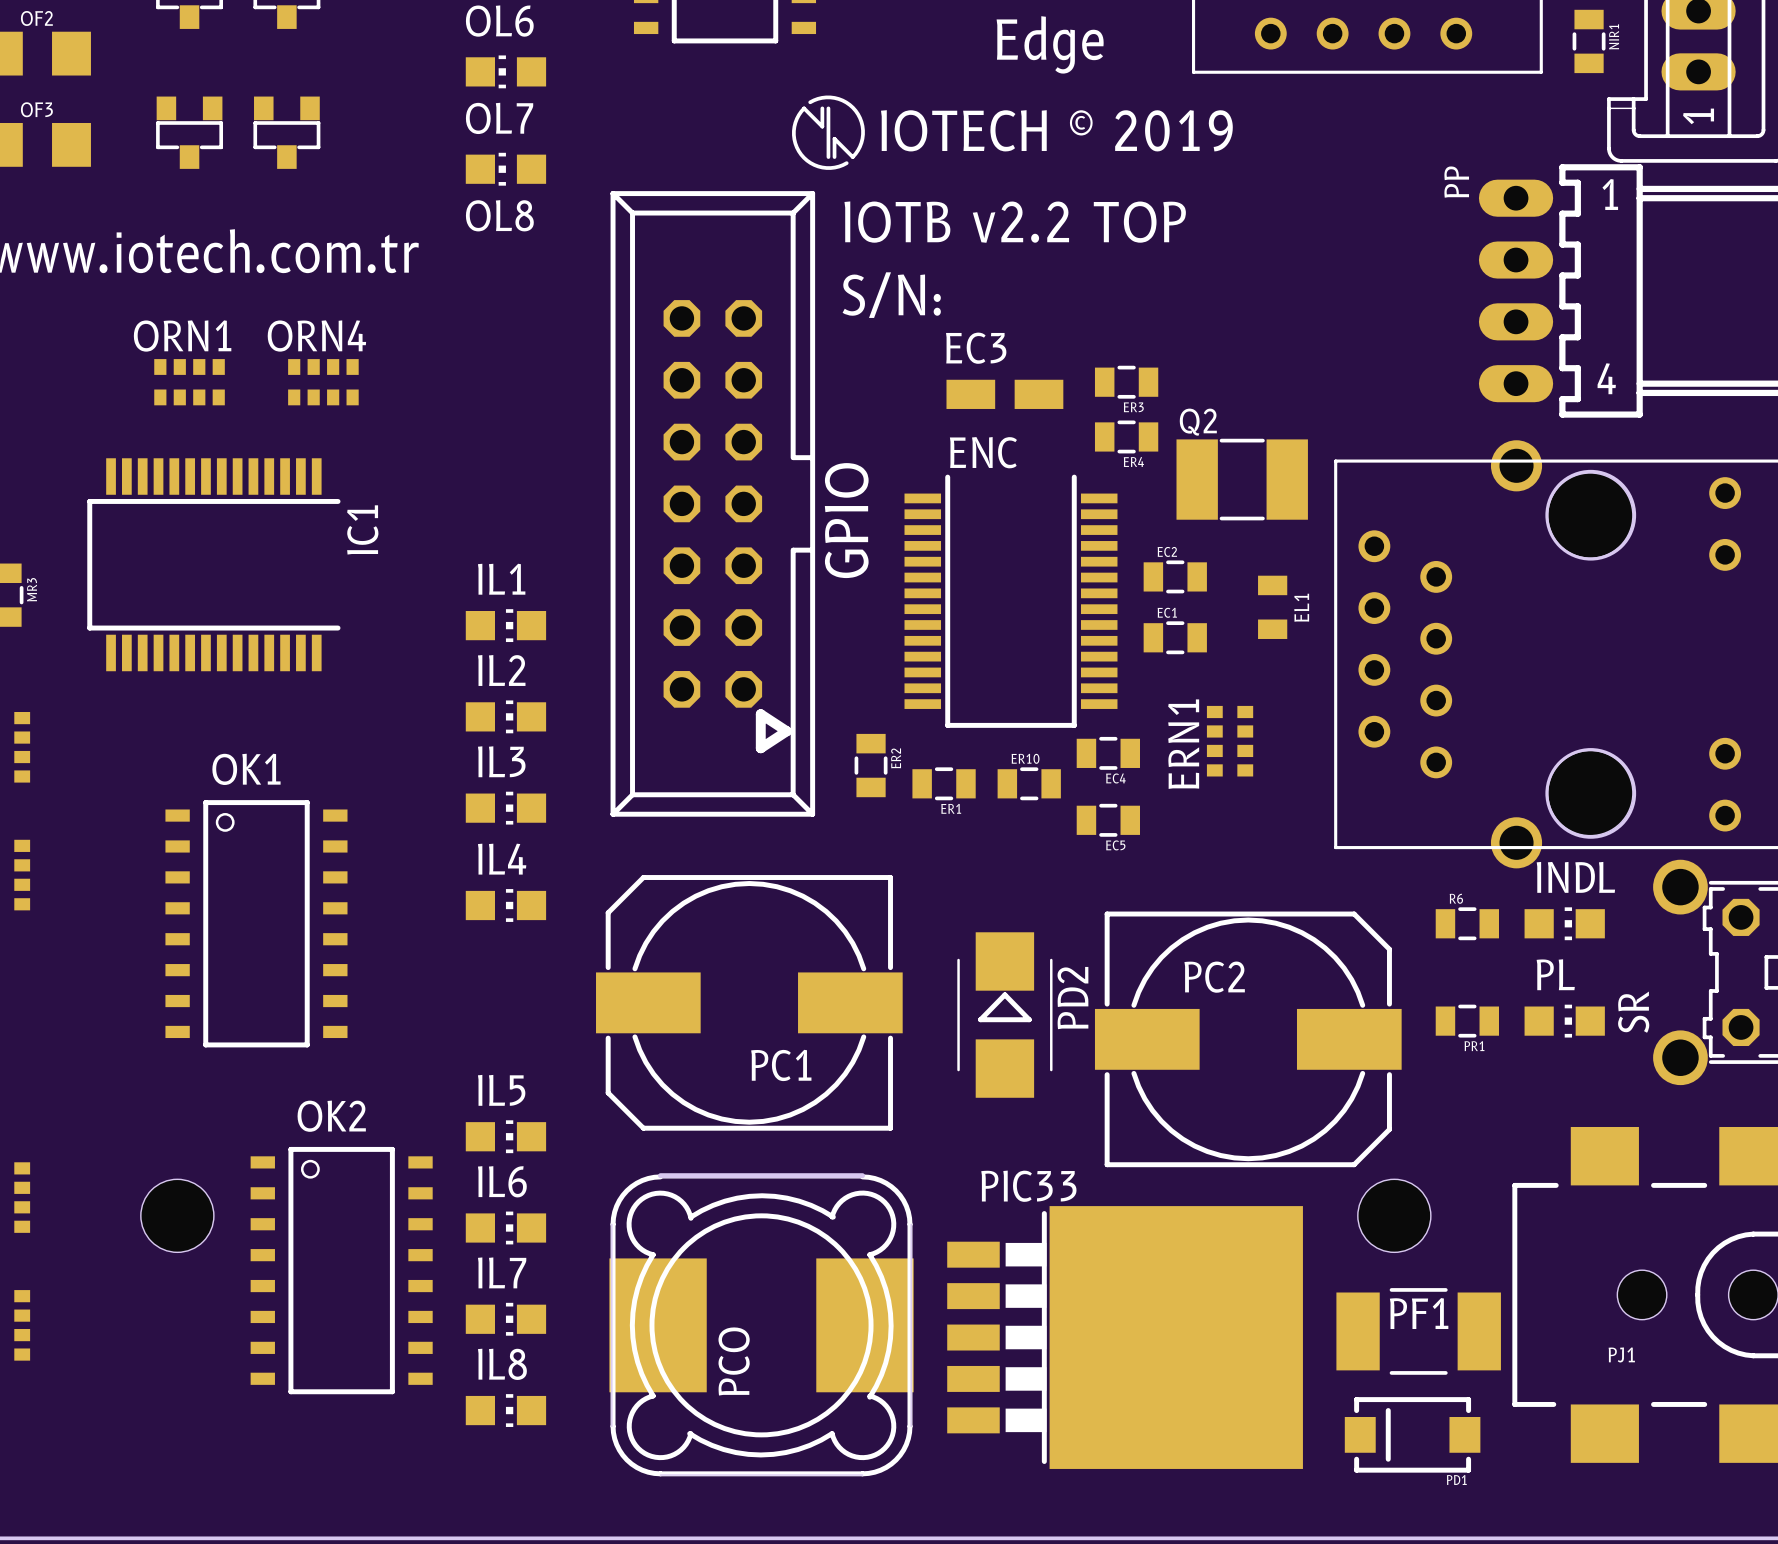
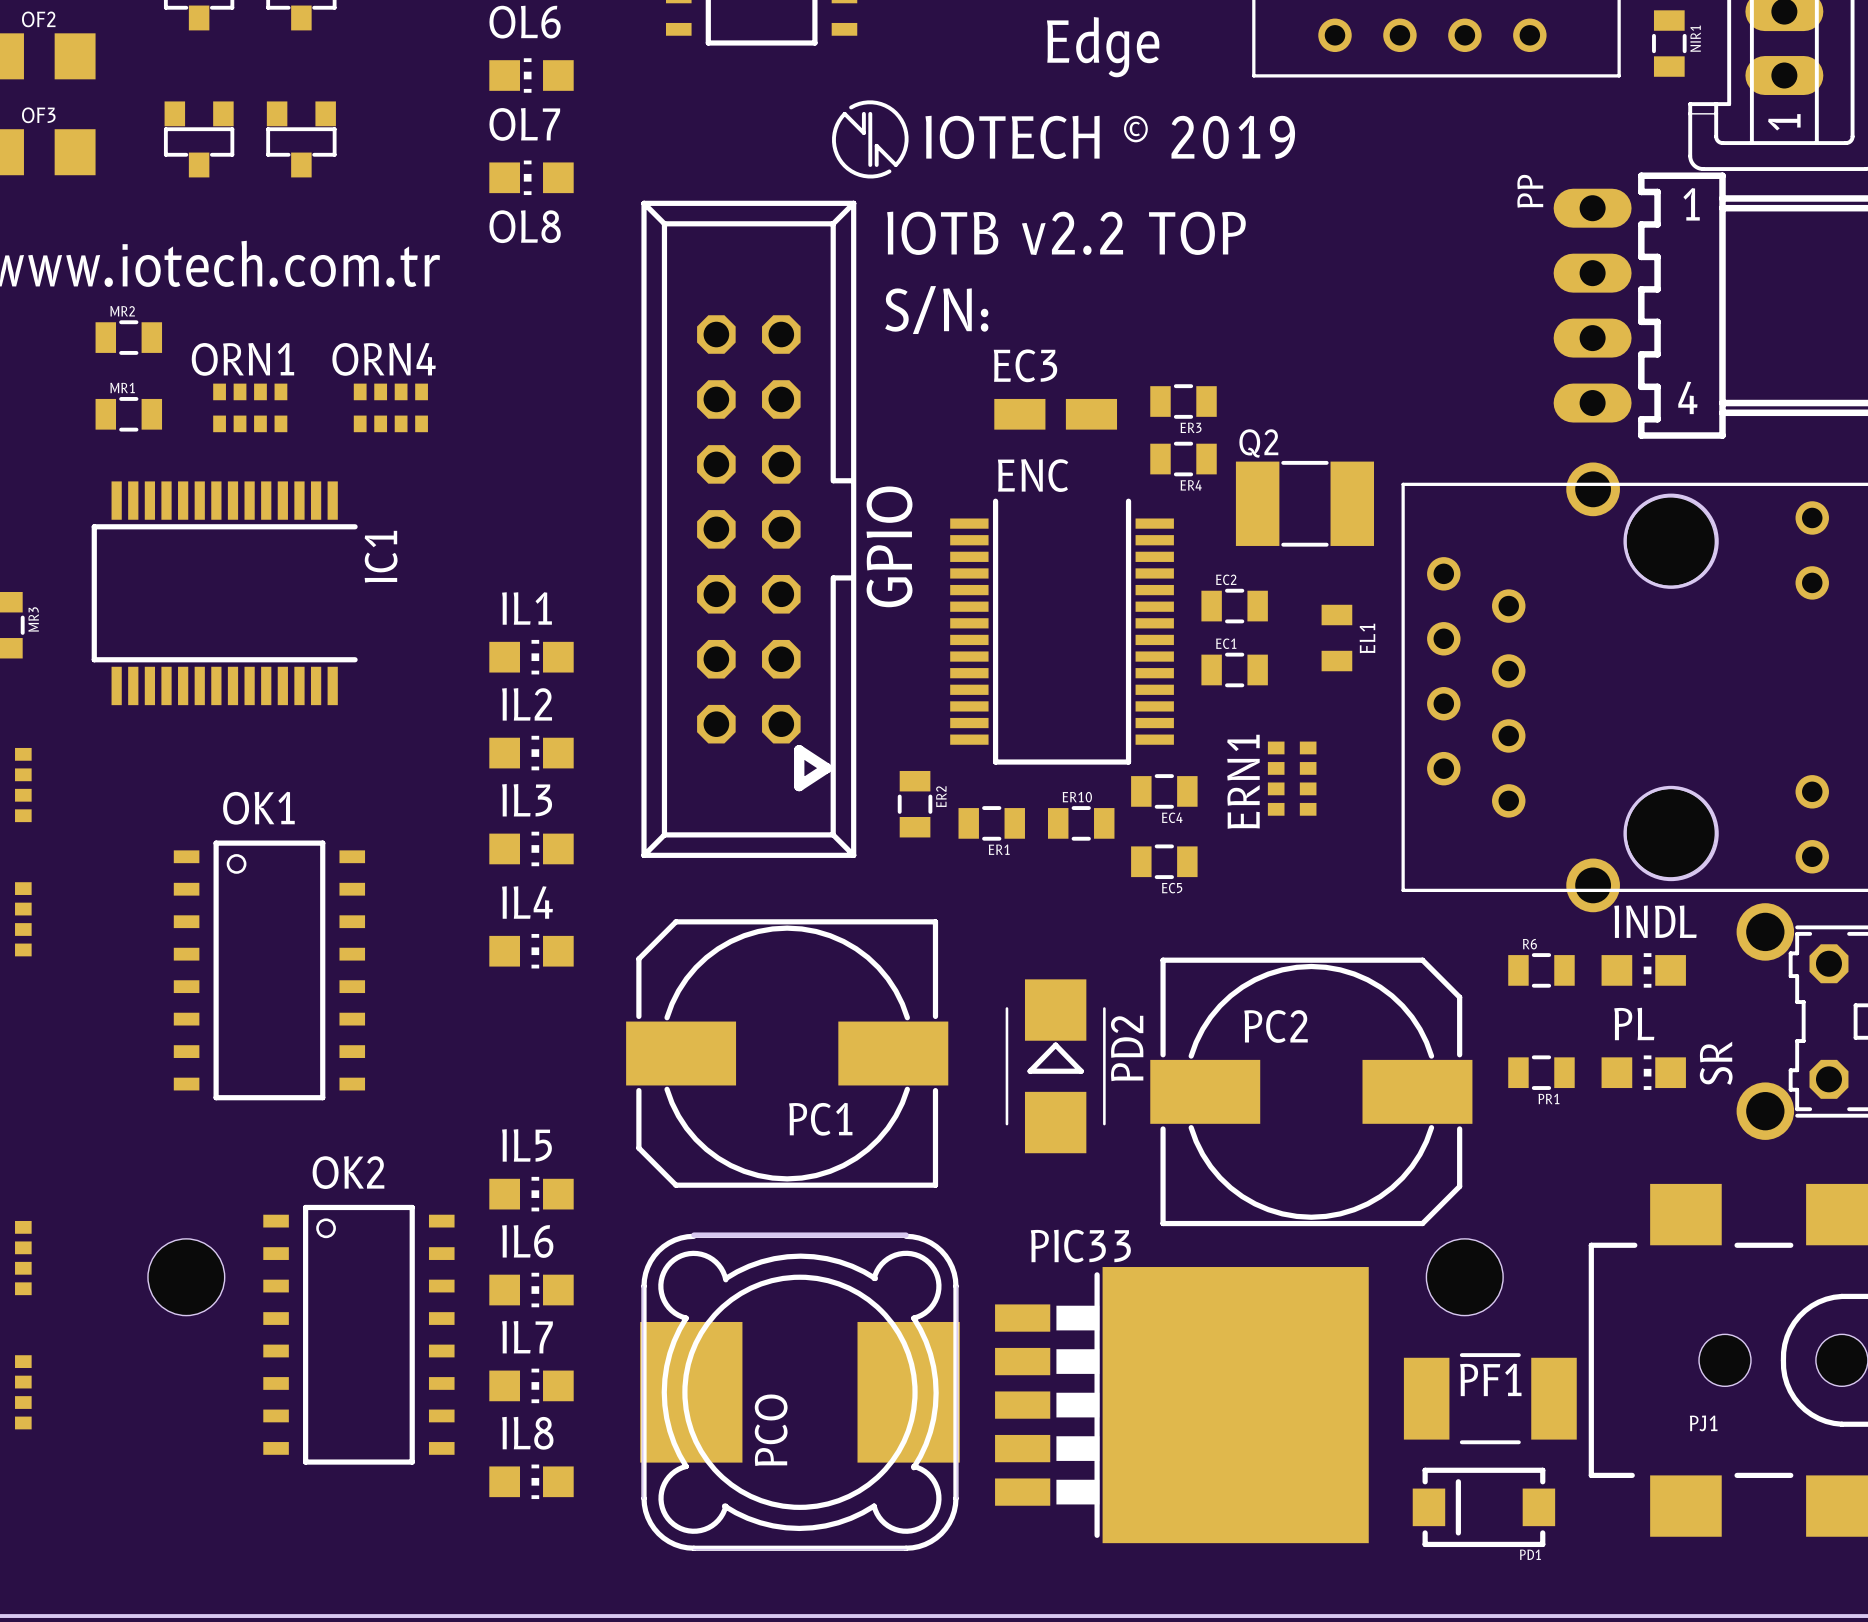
MR2: none -> (128, 337)
ORN1 position: (189, 382) -> (250, 407)
ORN4 position: (323, 382) -> (390, 407)
MR1: none -> (128, 414)

